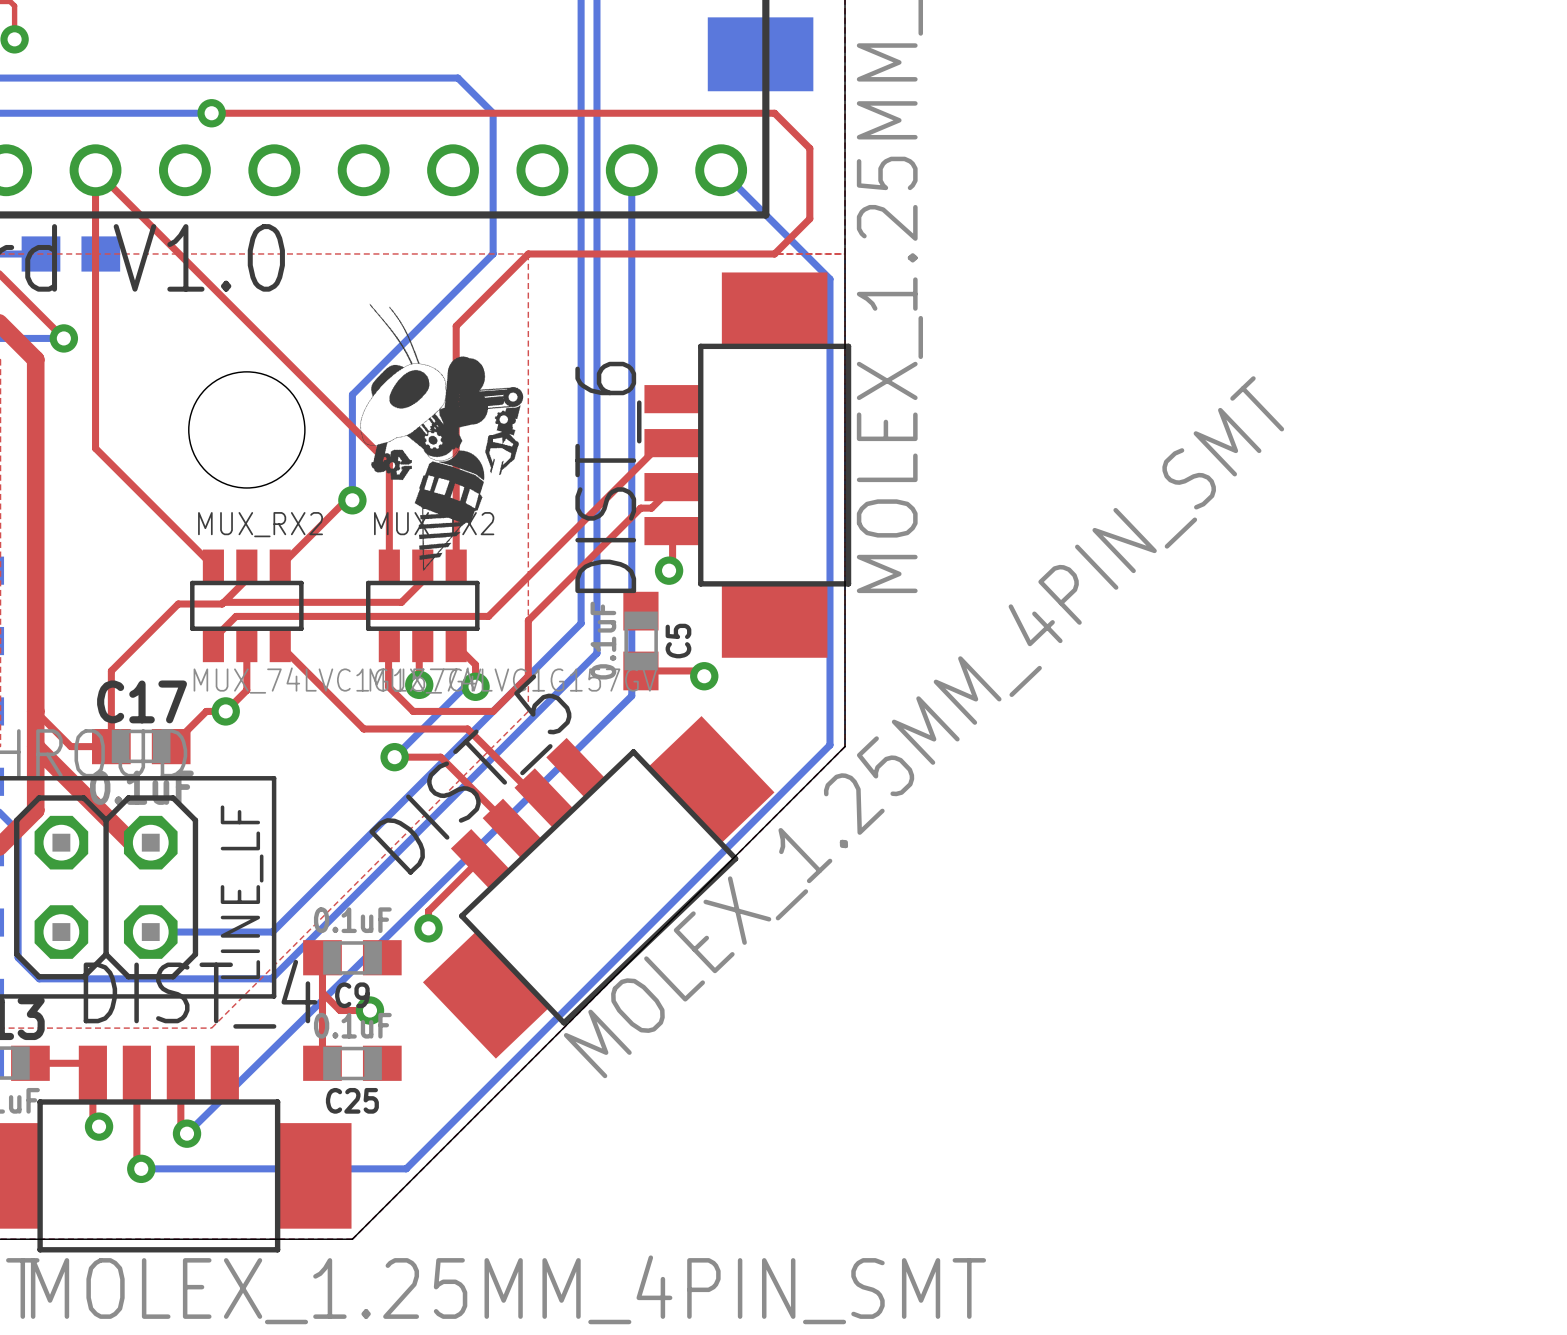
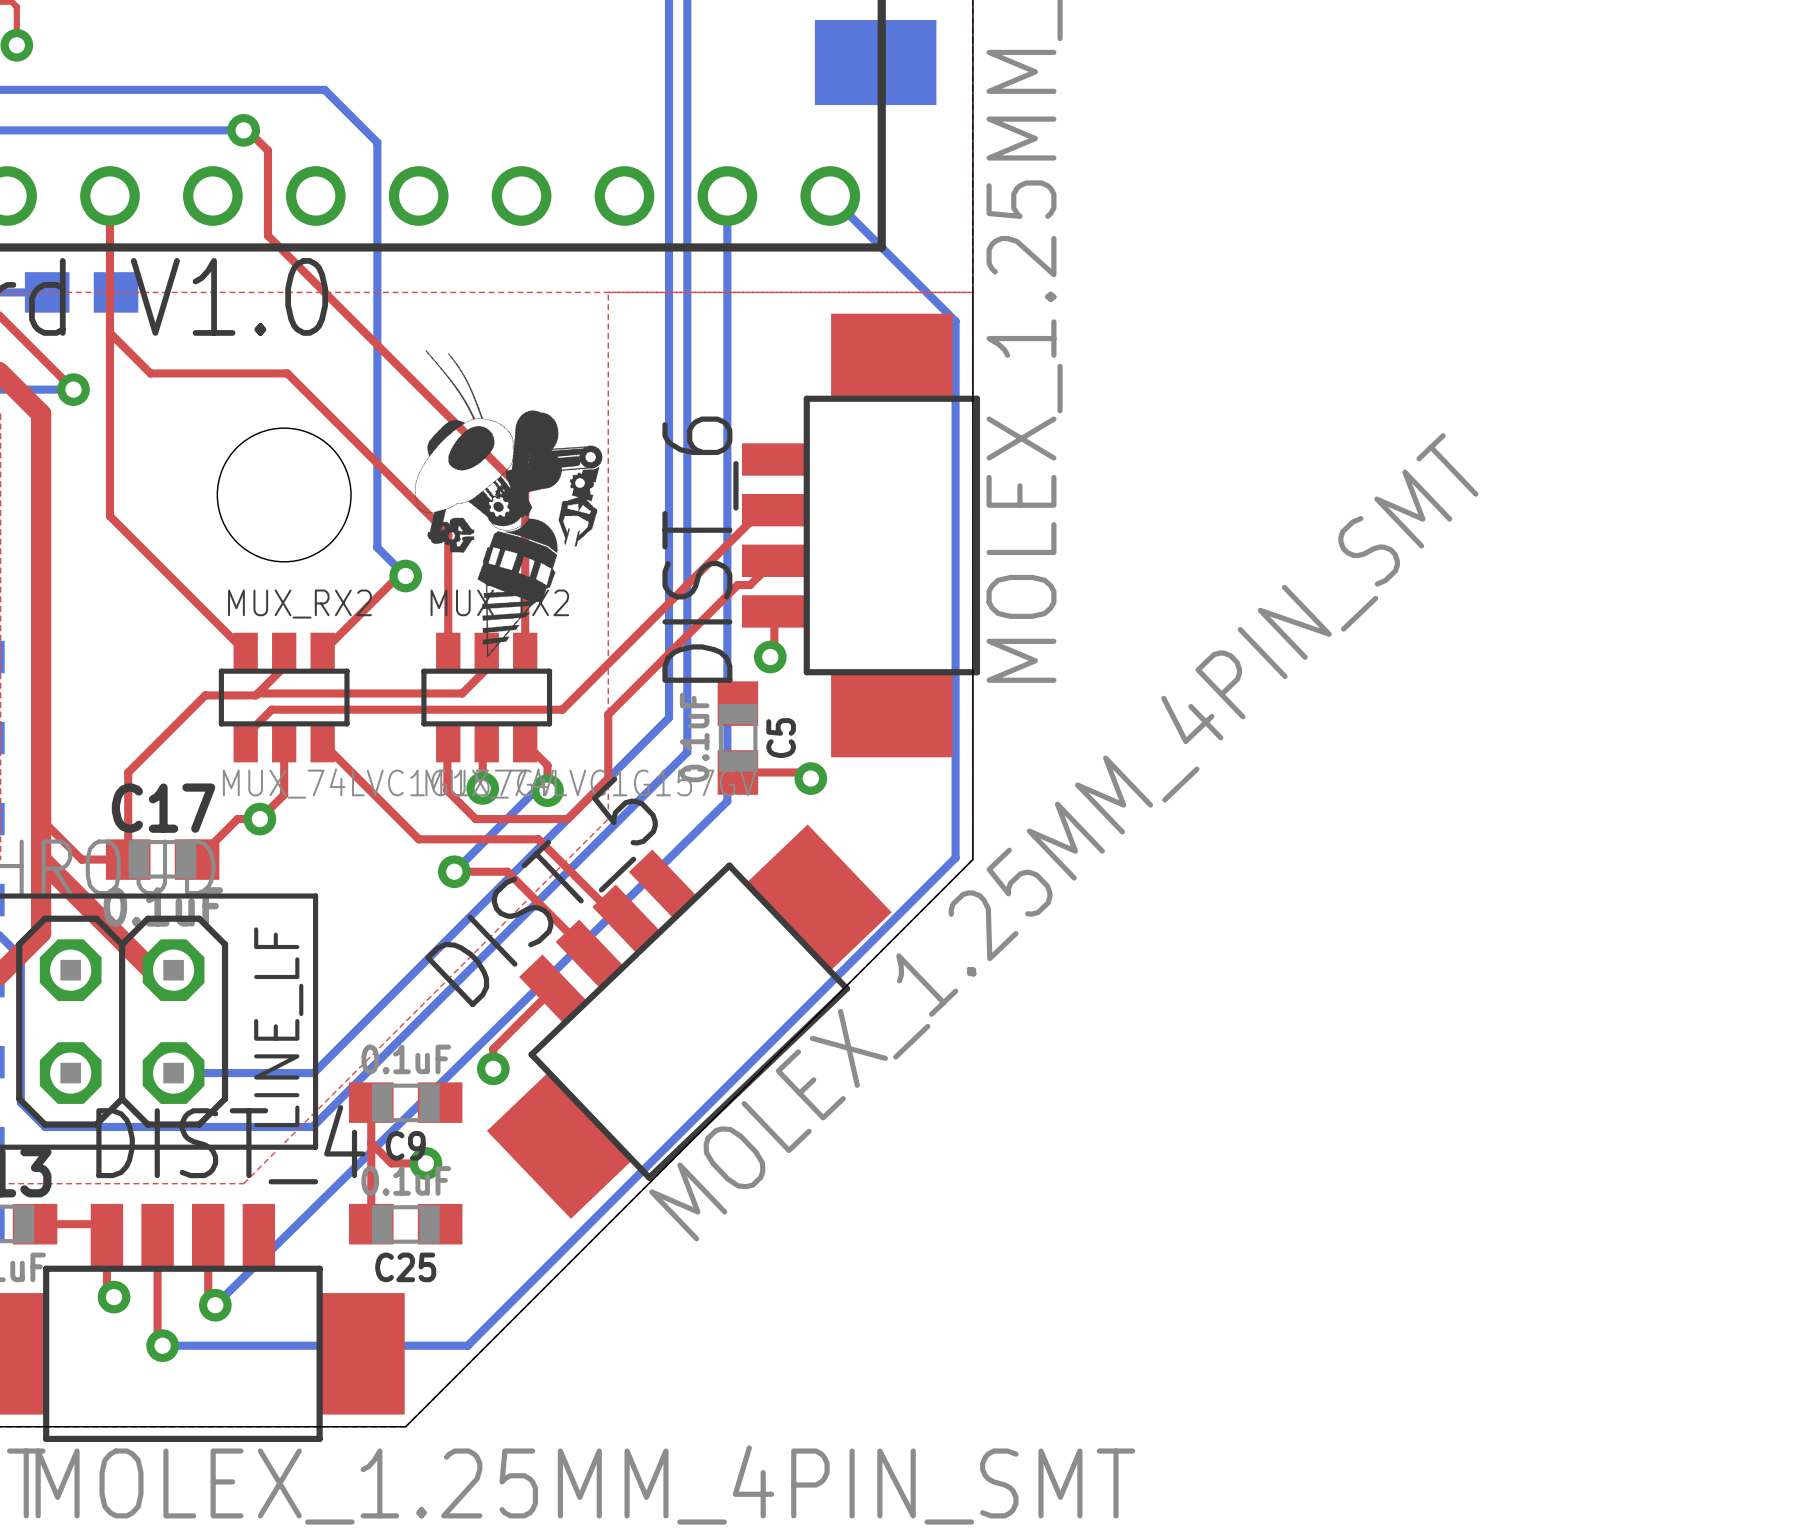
bottom track: (282, 78) (457, 78) (493, 113) (493, 253) (352, 394) (352, 500) -> (324, 89) (377, 142) (377, 547) (405, 576)
top track: (215, 113) (774, 113) (809, 148) (809, 218) (774, 253) (528, 253) (456, 326) (456, 428) -> (247, 130) (267, 150) (267, 235) (525, 492)
top track: (95, 170) (249, 324) -> (109, 332) (150, 373) (287, 373)

